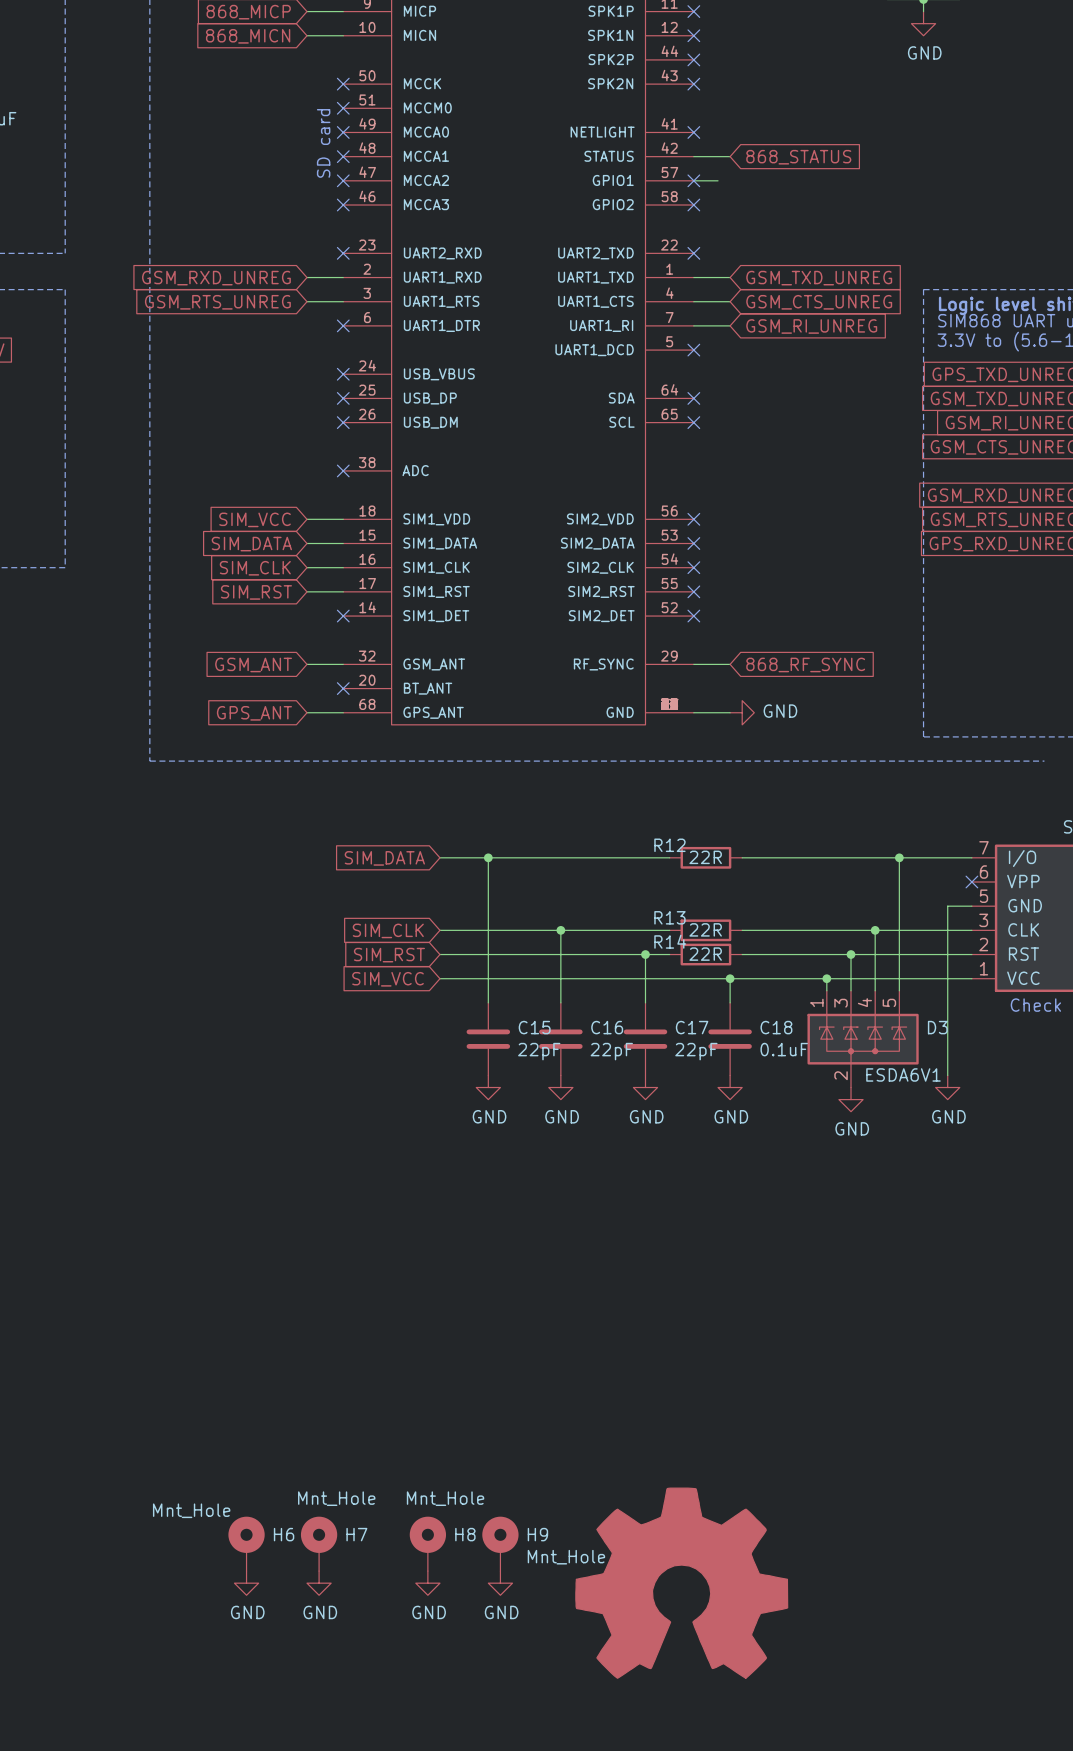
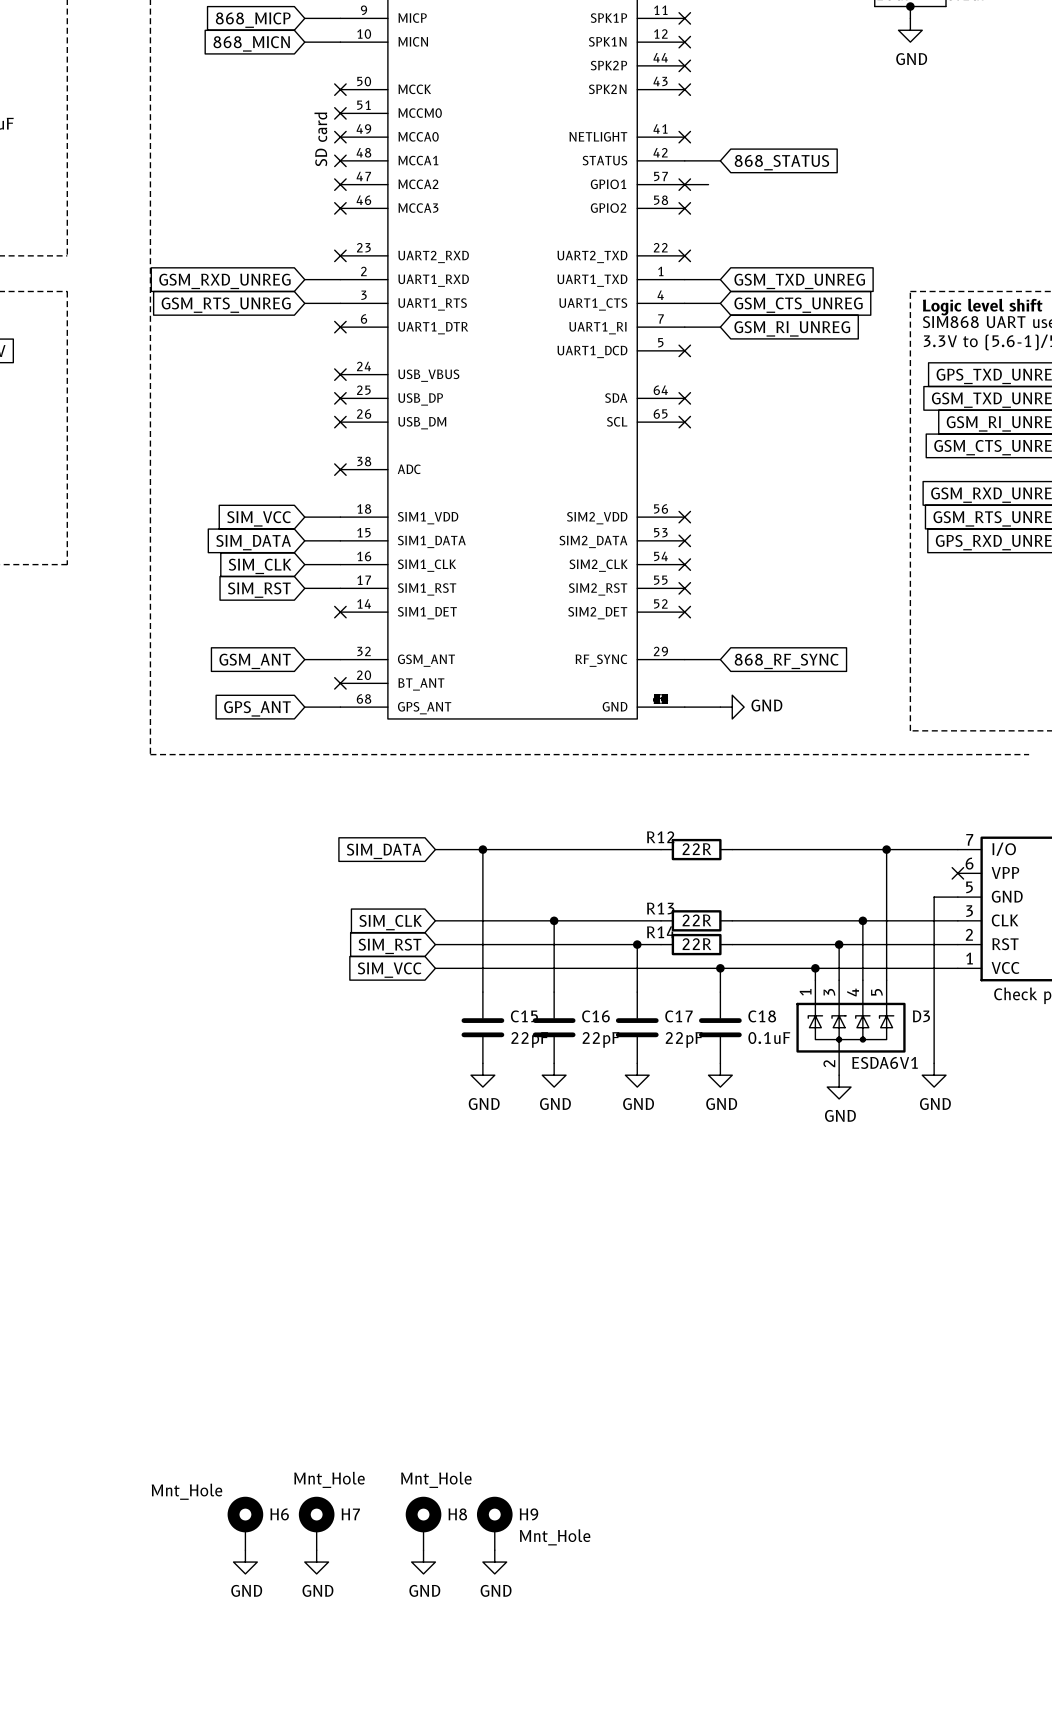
power symbol: (681, 1583) -> none

